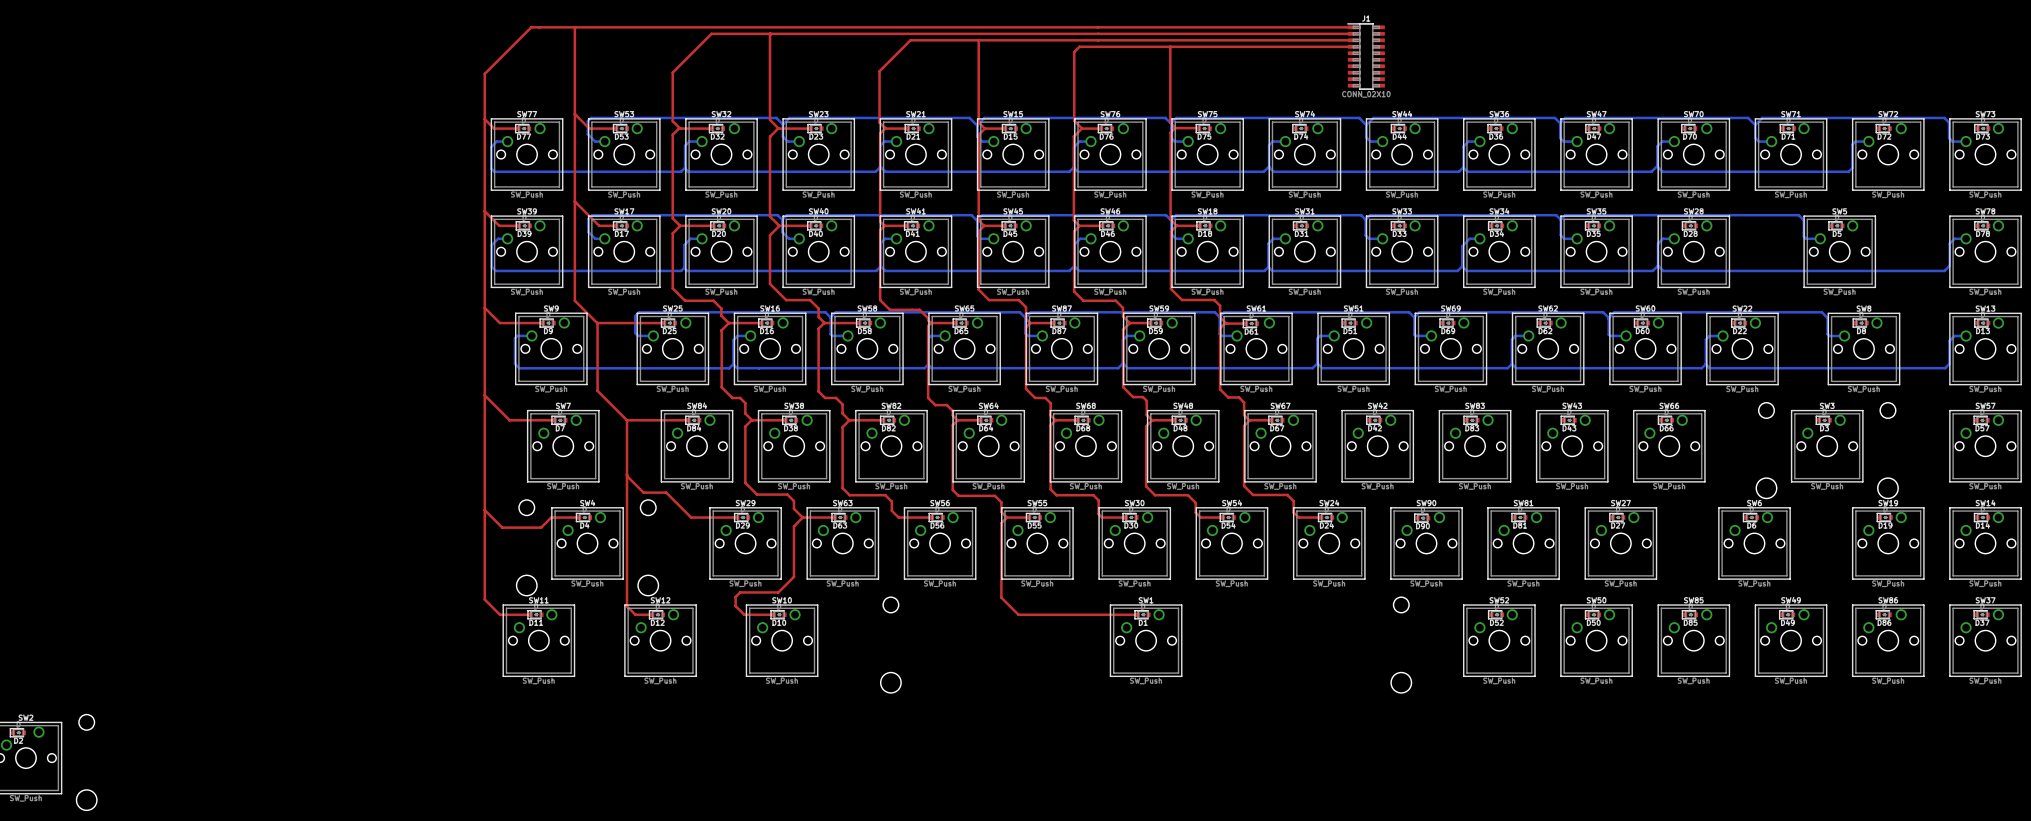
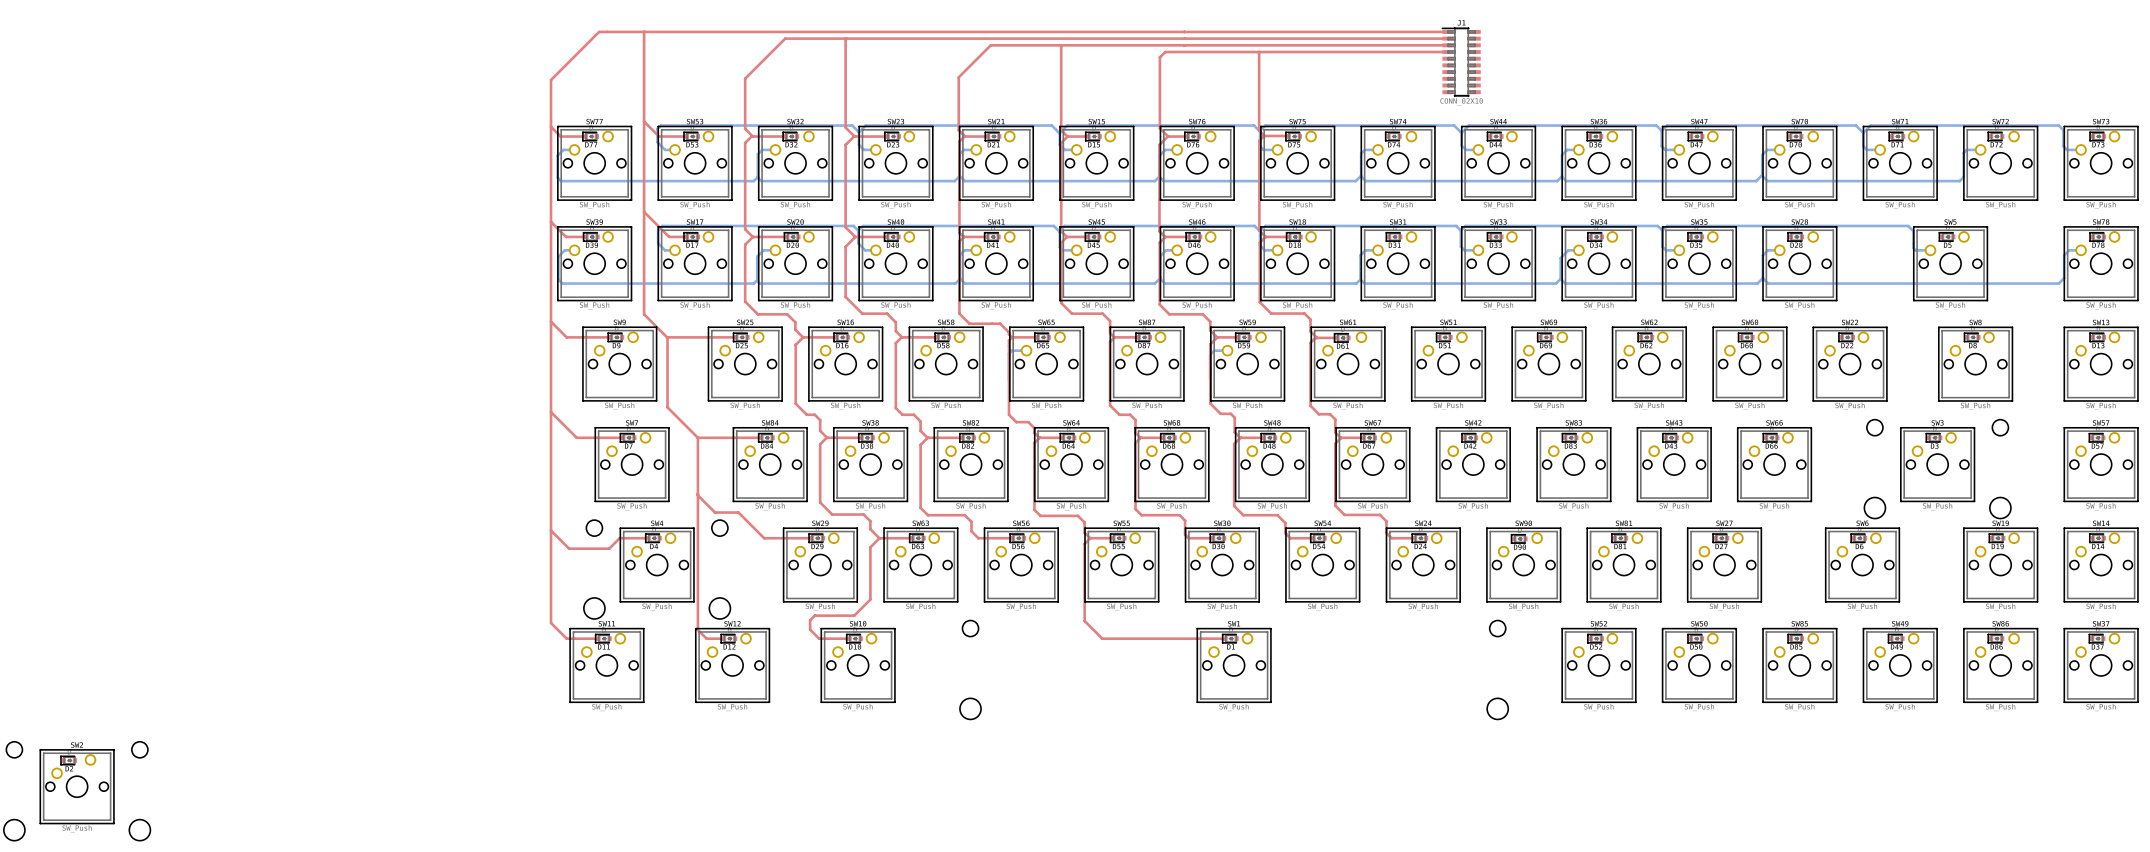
bottom track: (830, 317) (825, 312) (639, 312) (635, 316) (635, 333) (638, 335) (653, 335) -> none
bottom track: (1025, 317) (1019, 312) (835, 312) (830, 317) (830, 334) (847, 335) -> none
bottom track: (1025, 317) (1025, 333) (1027, 335) (1042, 335) -> none
bottom track: (1219, 317) (1214, 312) (1030, 312) (1025, 317) -> none
bottom track: (1414, 317) (1409, 312) (1224, 312) (1219, 316) (1219, 334) (1221, 335) (1237, 335) -> none
bottom track: (1608, 318) (1603, 312) (1419, 312) (1414, 317) (1414, 334) (1431, 335) -> none
bottom track: (531, 335) (517, 335) (514, 338) (514, 363) (519, 368) (729, 368) (733, 364) -> none
bottom track: (750, 335) (737, 335) (733, 340) (733, 364) (737, 368) (924, 368) (928, 364) (931, 368) (1118, 368) (1122, 363) (1127, 368) (1312, 368) (1317, 363) -> none
bottom track: (1334, 335) (1320, 335) (1317, 338) (1317, 363) -> none
bottom track: (1528, 335) (1515, 335) (1511, 339) (1511, 364) -> none
bottom track: (1626, 335) (1608, 334) (1608, 318) (1614, 312) (1821, 312) (1827, 318) (1827, 334) (1829, 336) (1844, 336) -> none
bottom track: (1723, 336) (1709, 336) (1705, 339) (1705, 364) (1709, 368) (1945, 368) (1949, 363) (1949, 341) (1954, 336) (1966, 336) -> none
bottom track: (1317, 363) (1322, 368) (1507, 368) (1511, 364) -> none
bottom track: (1511, 364) (1516, 368) (1701, 368) (1705, 364) -> none

